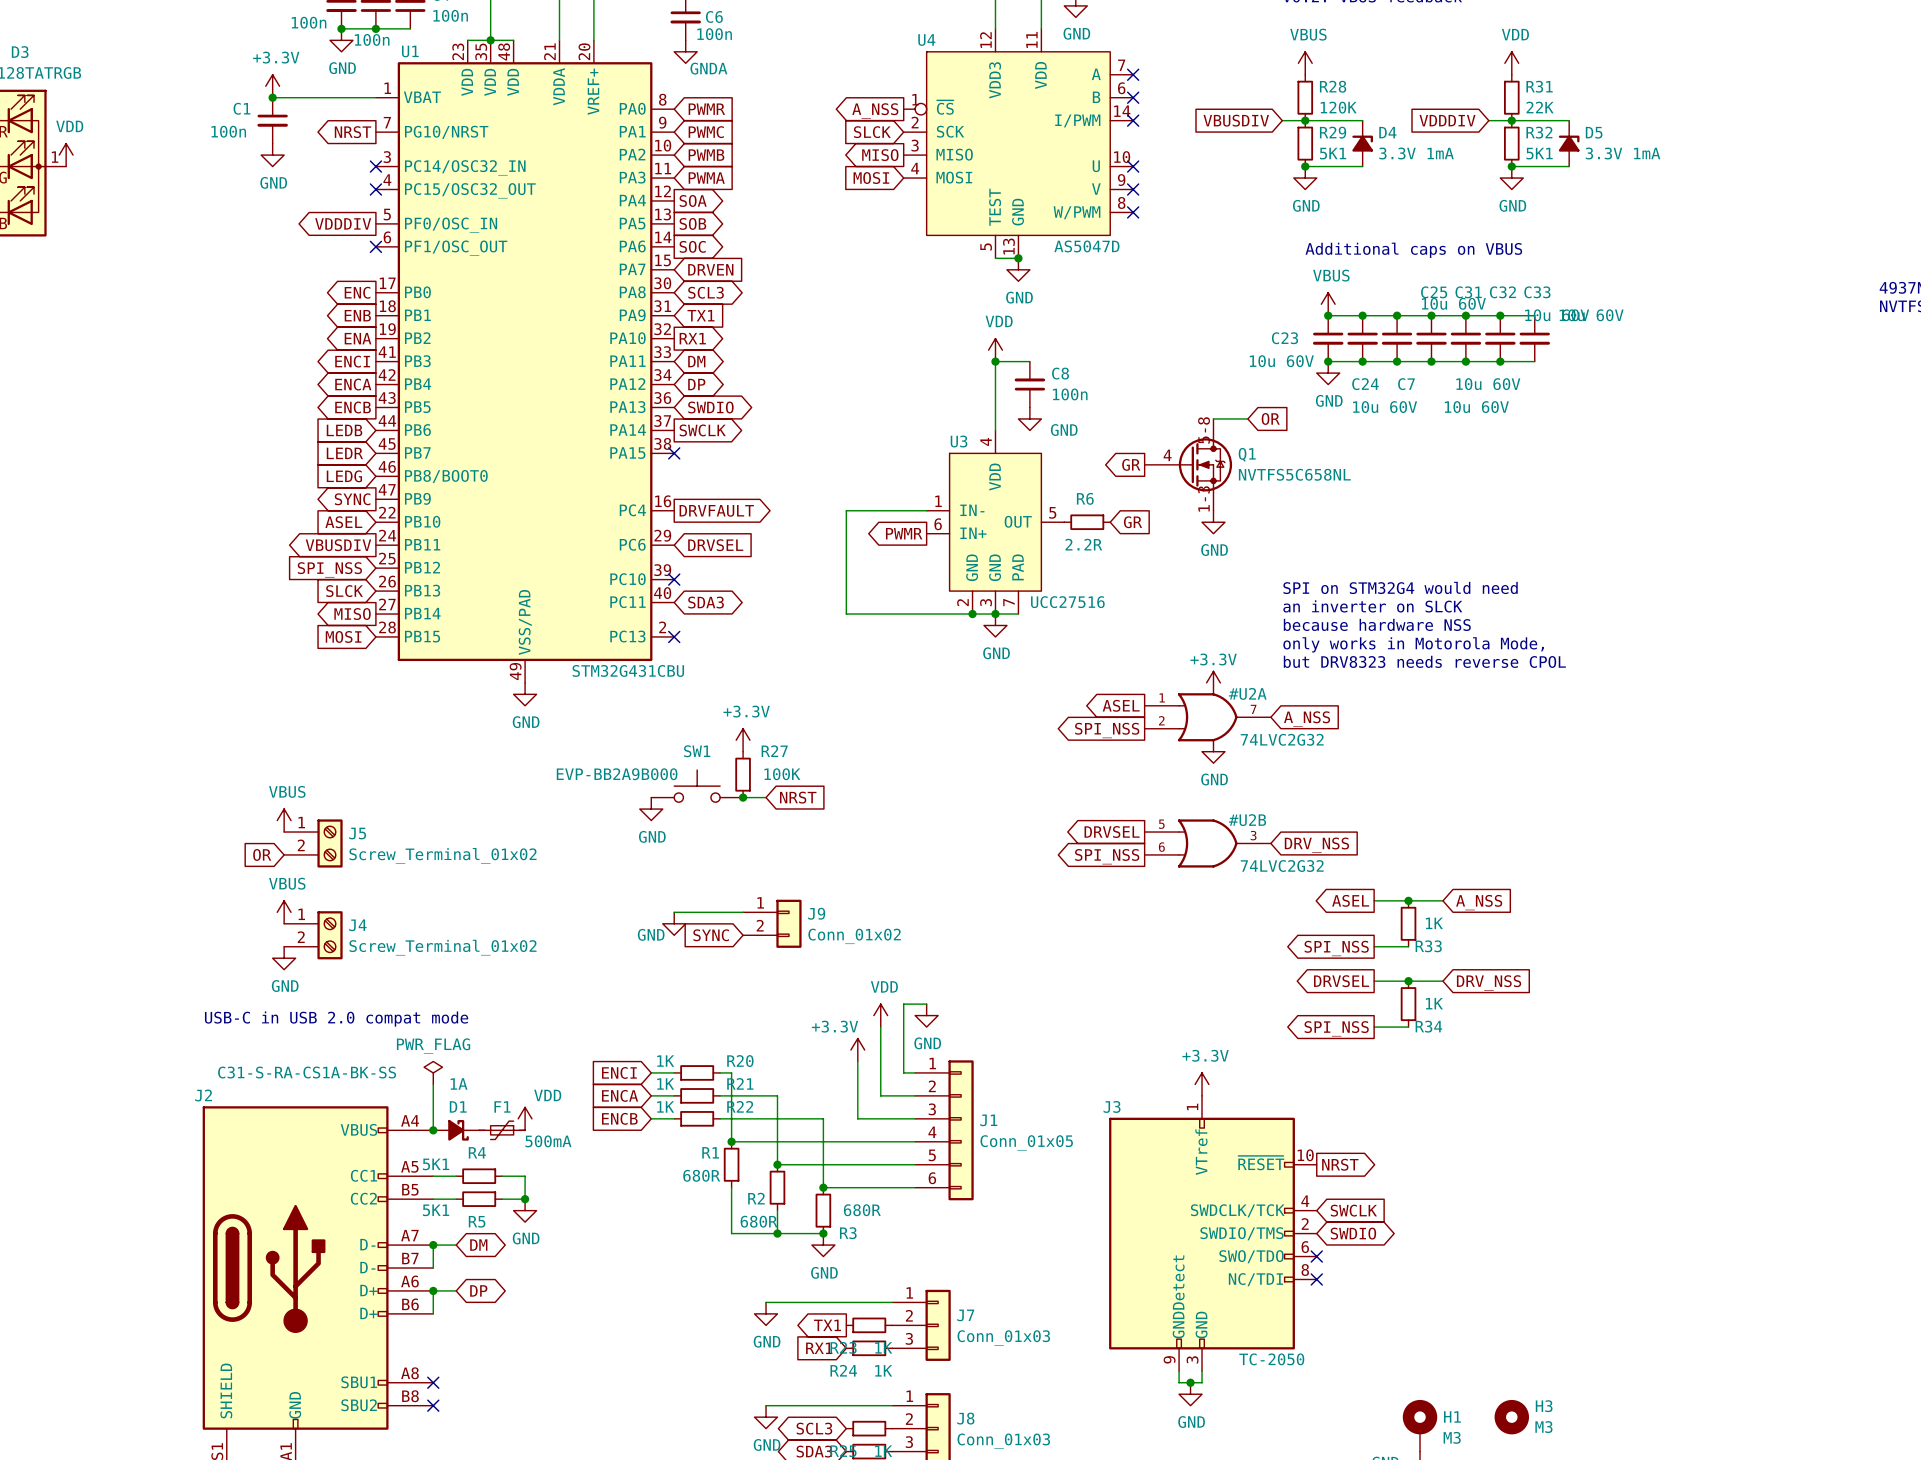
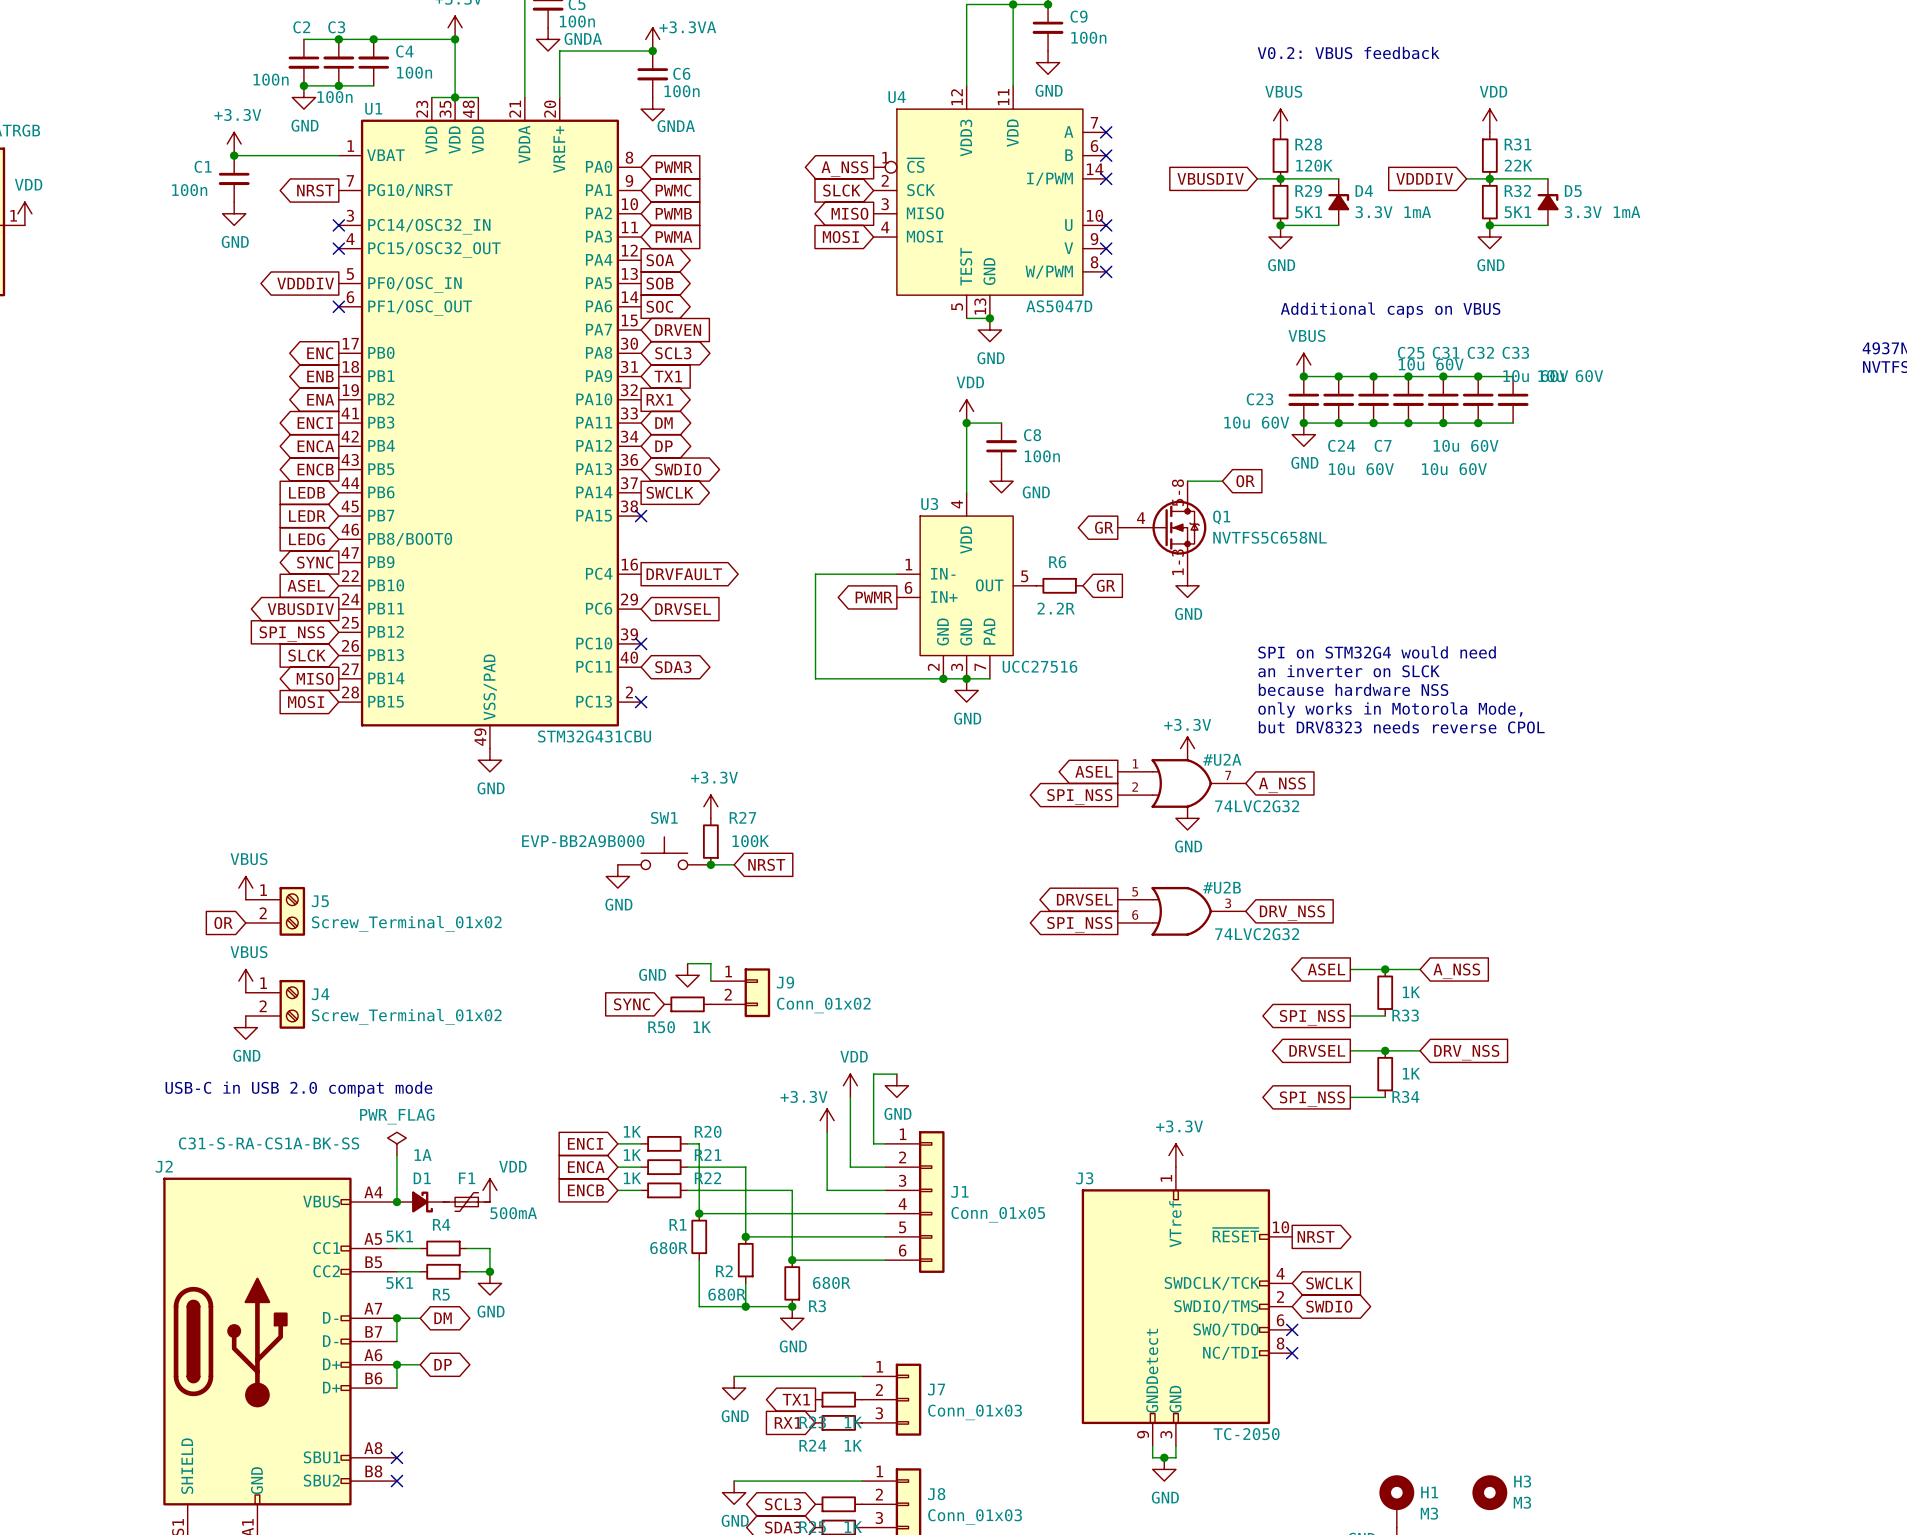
wire: (674, 912) (743, 912) -> (687, 963) (710, 963) (710, 981)
power symbol position: GND (674, 923) -> GND (687, 975)
power symbol text position: GND (651, 934) -> GND (652, 974)
global label position: SYNC (711, 935) -> SYNC (631, 1004)
R50: none -> 1K (687, 1004)

